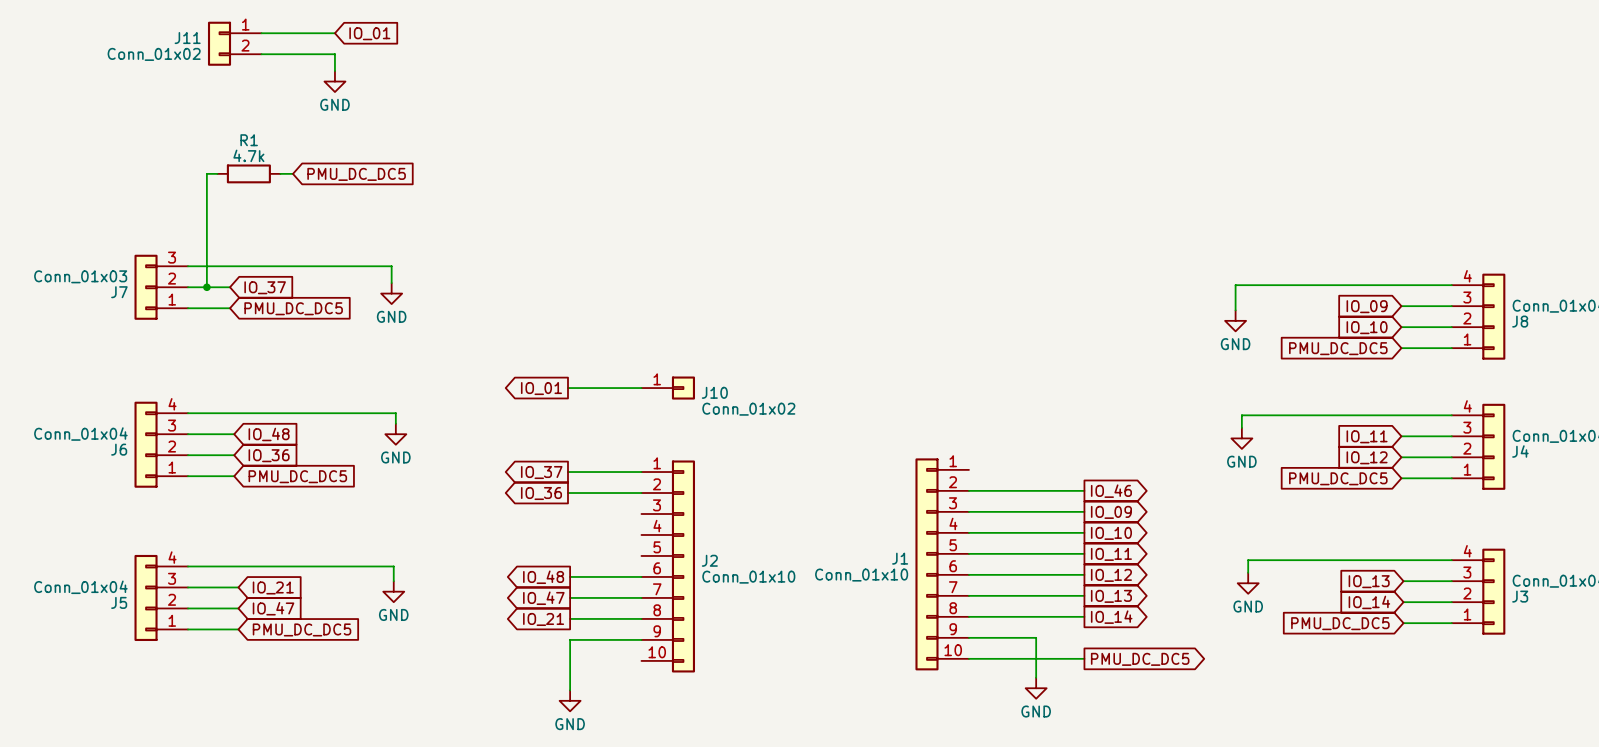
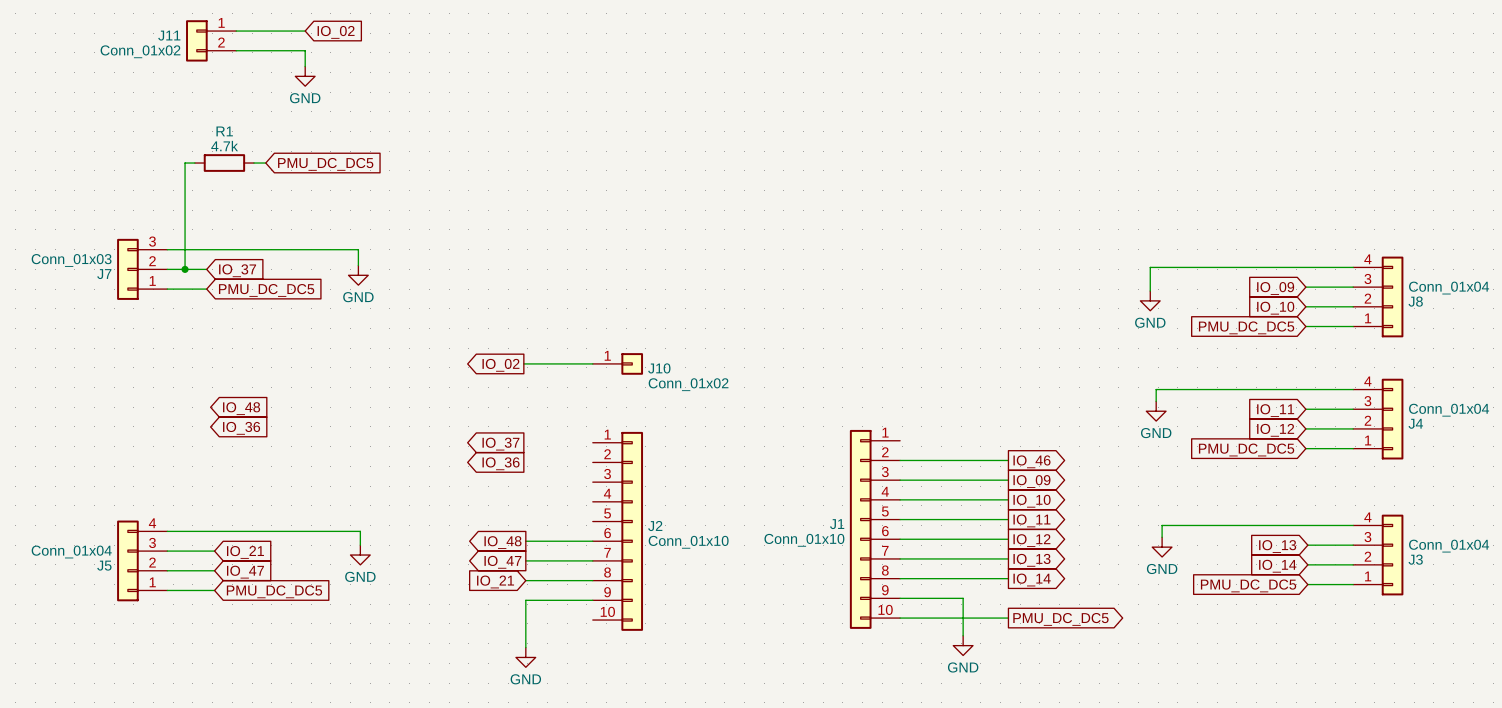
global label: IO_01 (369, 33) -> IO_02 (336, 32)
global label: IO_01 (541, 388) -> IO_02 (500, 365)
wire: (188, 413) (395, 413) (395, 423) -> none
wire: (188, 434) (234, 434) -> none
power symbol: GND (395, 434) -> none
J6: Conn_01x04 (161, 444) -> none
wire: (188, 455) (234, 455) -> none
wire: (567, 472) (641, 472) -> none
wire: (188, 476) (234, 476) -> none
global label: PMU_DC_DC5 (297, 476) -> none
wire: (567, 493) (641, 493) -> none
global label shape: output (543, 619) -> input (495, 581)

